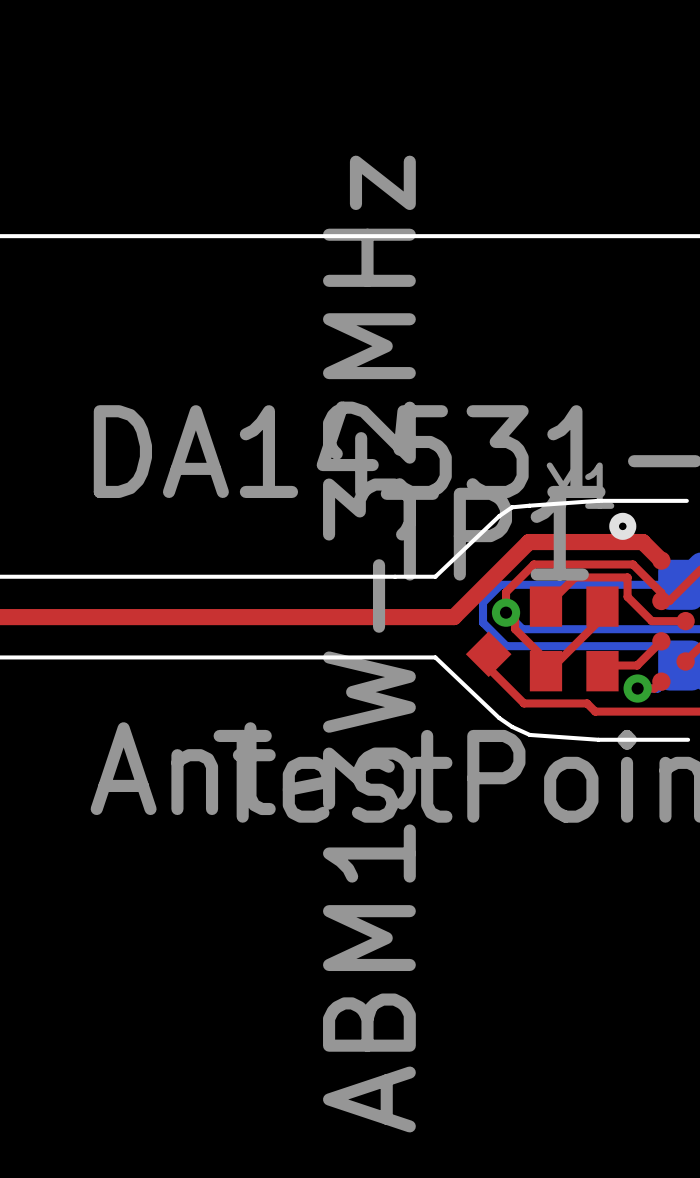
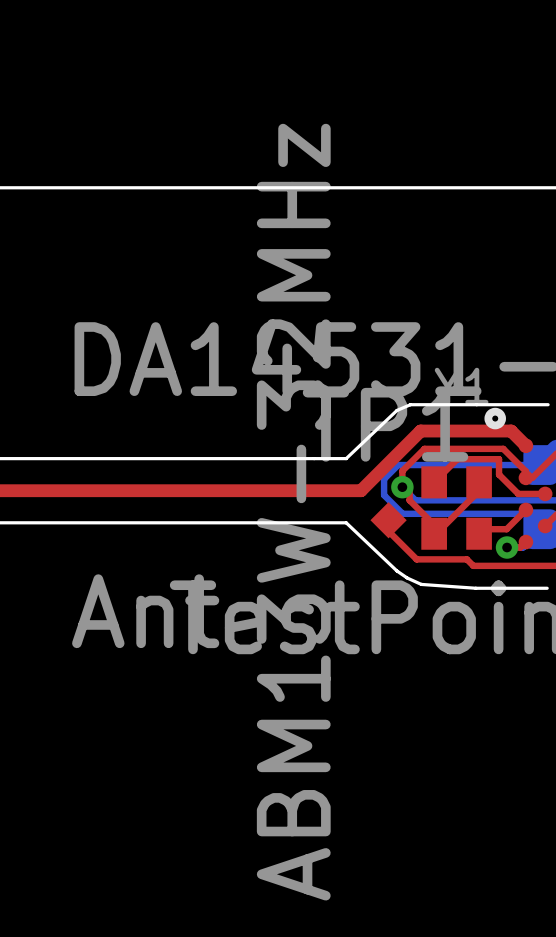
board edge: (597, 500) (686, 500) -> none
board edge: (598, 500) (512, 507) (499, 516) -> (548, 404) (410, 404) (396, 410)

